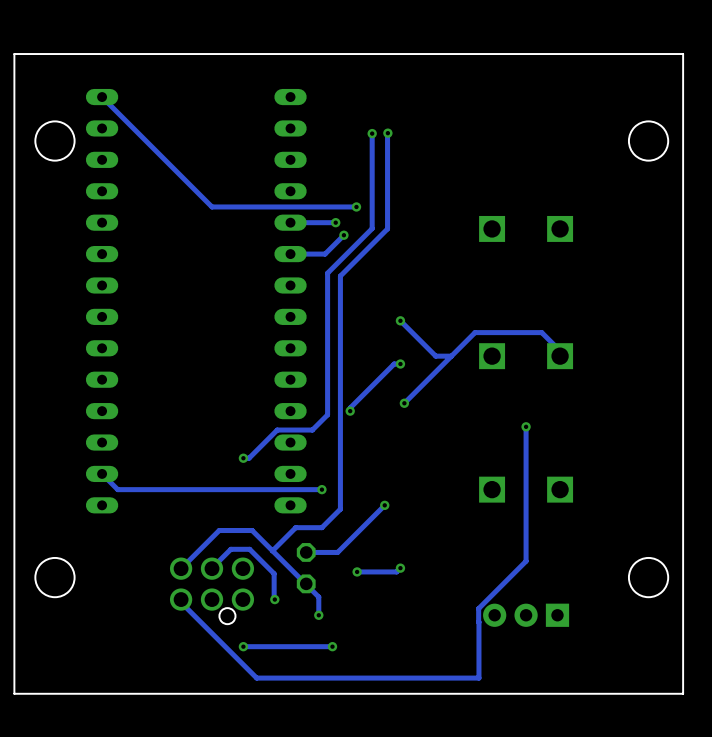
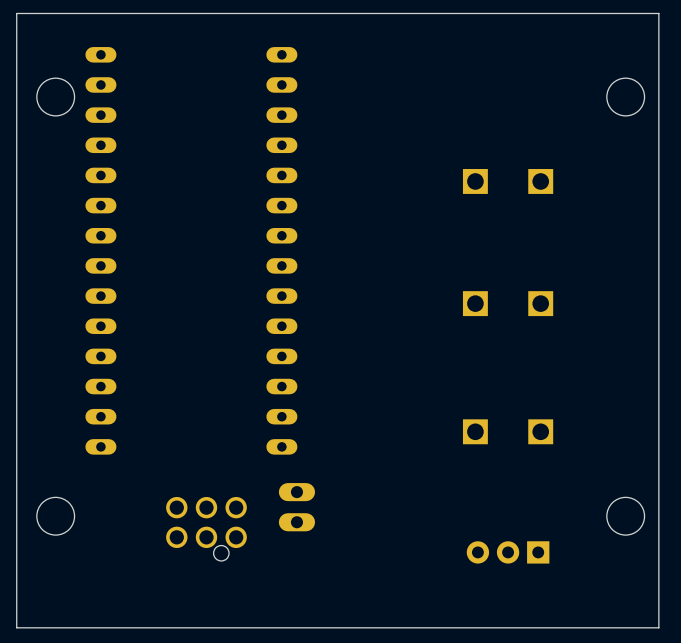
track: (102, 97) (212, 206) (356, 206) -> none
track: (372, 133) (372, 228) (327, 273) (327, 414) (312, 430) (277, 430) (249, 458) (243, 458) -> none
via: (372, 133) -> none
track: (387, 133) (387, 228) (340, 276) (340, 509) (321, 527) (295, 527) (272, 550) -> none
via: (387, 133) -> none
via: (356, 206) -> none
track: (335, 222) (290, 222) -> none
via: (335, 222) -> none
track: (343, 235) (325, 254) (290, 254) -> none
via: (343, 235) -> none
track: (400, 320) (435, 356) (451, 356) -> none
via: (400, 320) -> none
track: (560, 356) (560, 350) (541, 332) (475, 332) (404, 403) -> none
track: (400, 364) (394, 364) (350, 407) (350, 411) -> none
via: (400, 364) -> none
via: (404, 403) -> none
via: (350, 411) -> none
track: (526, 426) (526, 561) (478, 608) (478, 678) (256, 678) (181, 602) (181, 599) -> none
via: (526, 426) -> none
via: (243, 458) -> none
track: (102, 473) (117, 489) (321, 489) -> none
via: (321, 489) -> none
track: (384, 505) (337, 552) (306, 552) -> none
via: (384, 505) -> none
part footprint: [296, 543, 316, 594] -> [278, 483, 316, 532]
track: (181, 568) (219, 530) (252, 530) (318, 597) (318, 615) -> none
track: (212, 568) (230, 549) (249, 549) (274, 573) (274, 599) -> none
track: (400, 568) (396, 571) (357, 571) -> none
via: (400, 568) -> none
via: (357, 571) -> none
via: (274, 599) -> none
via: (318, 615) -> none
via: (243, 646) -> none
track: (332, 646) (243, 646) -> none
via: (332, 646) -> none

